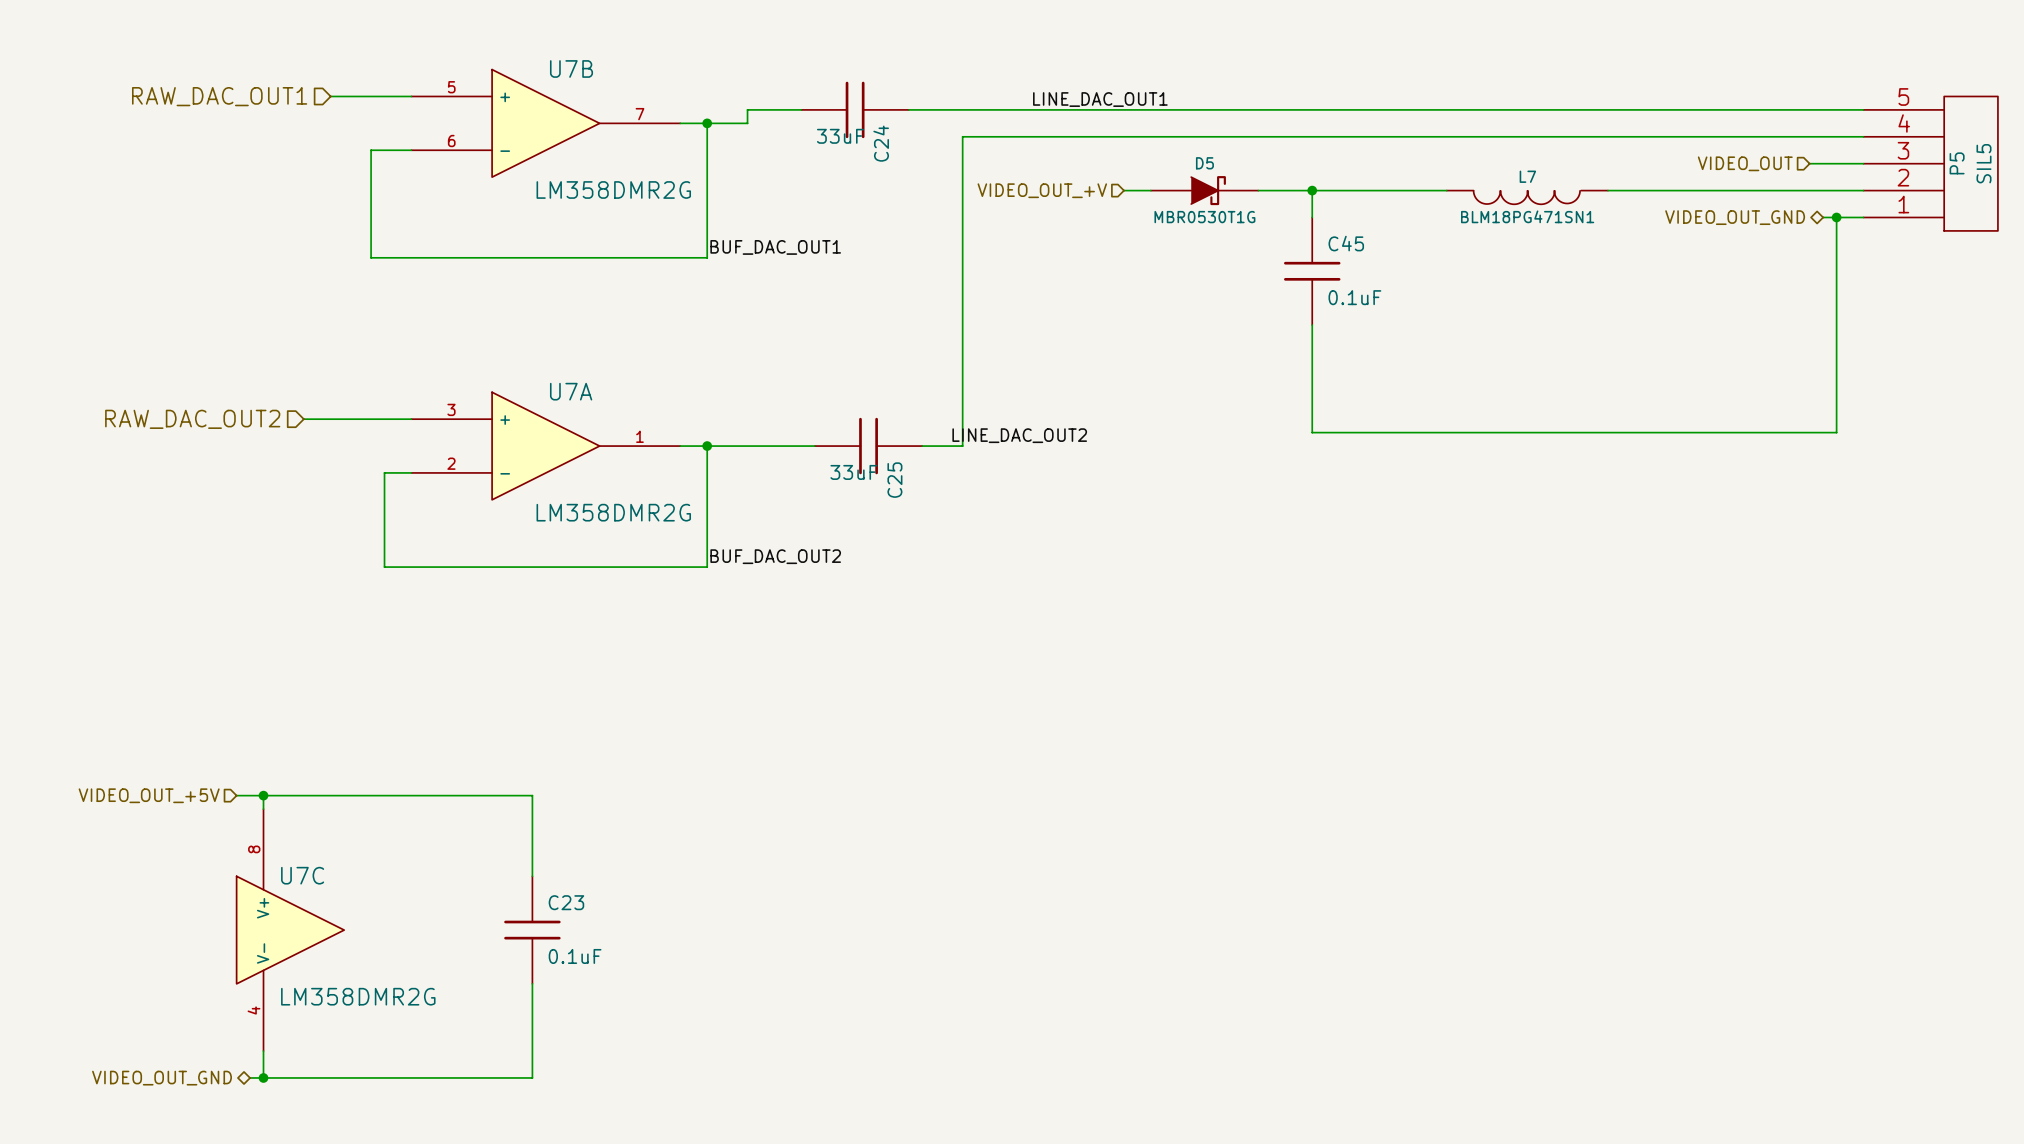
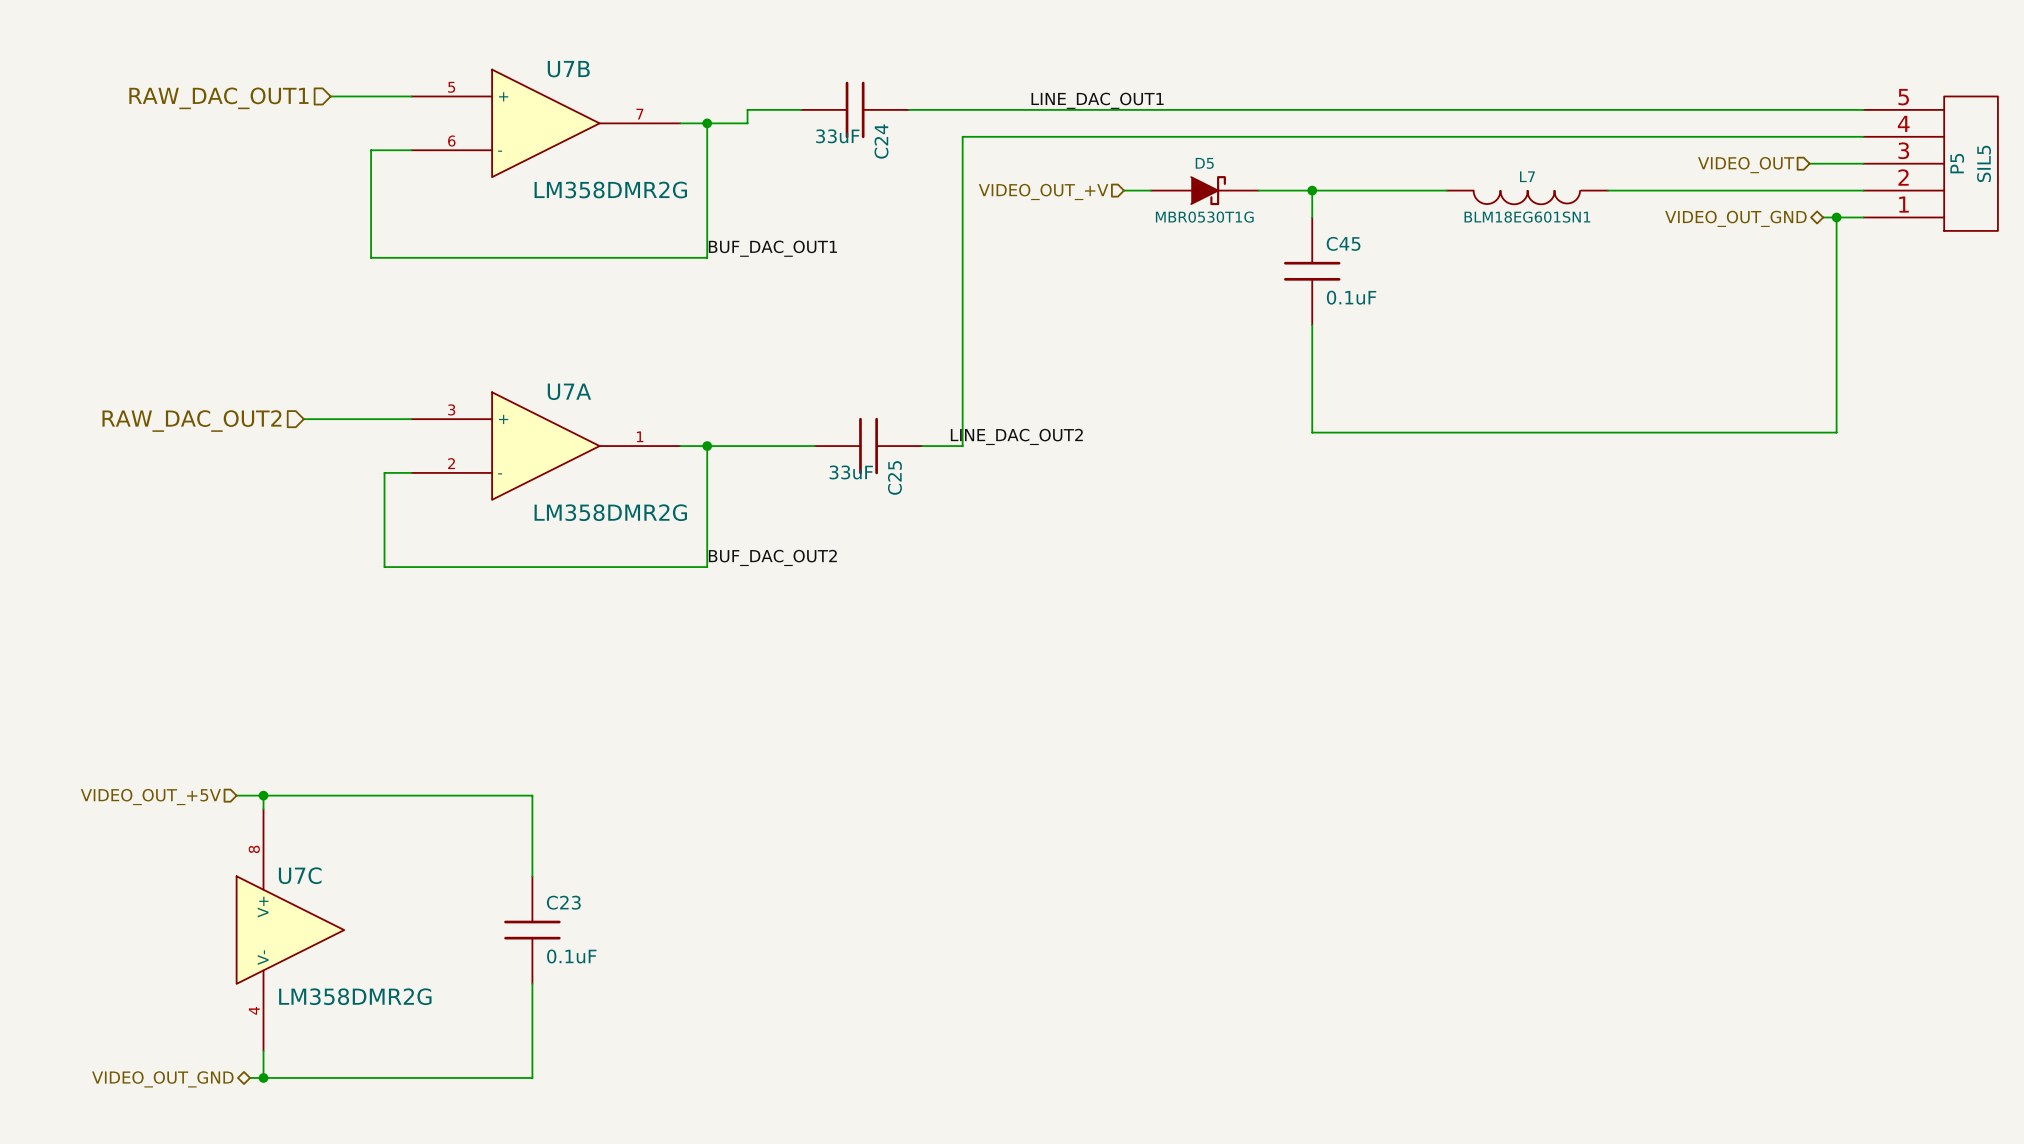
L7 value: BLM18PG471SN1 (1527, 216) -> BLM18EG601SN1 (1527, 217)

